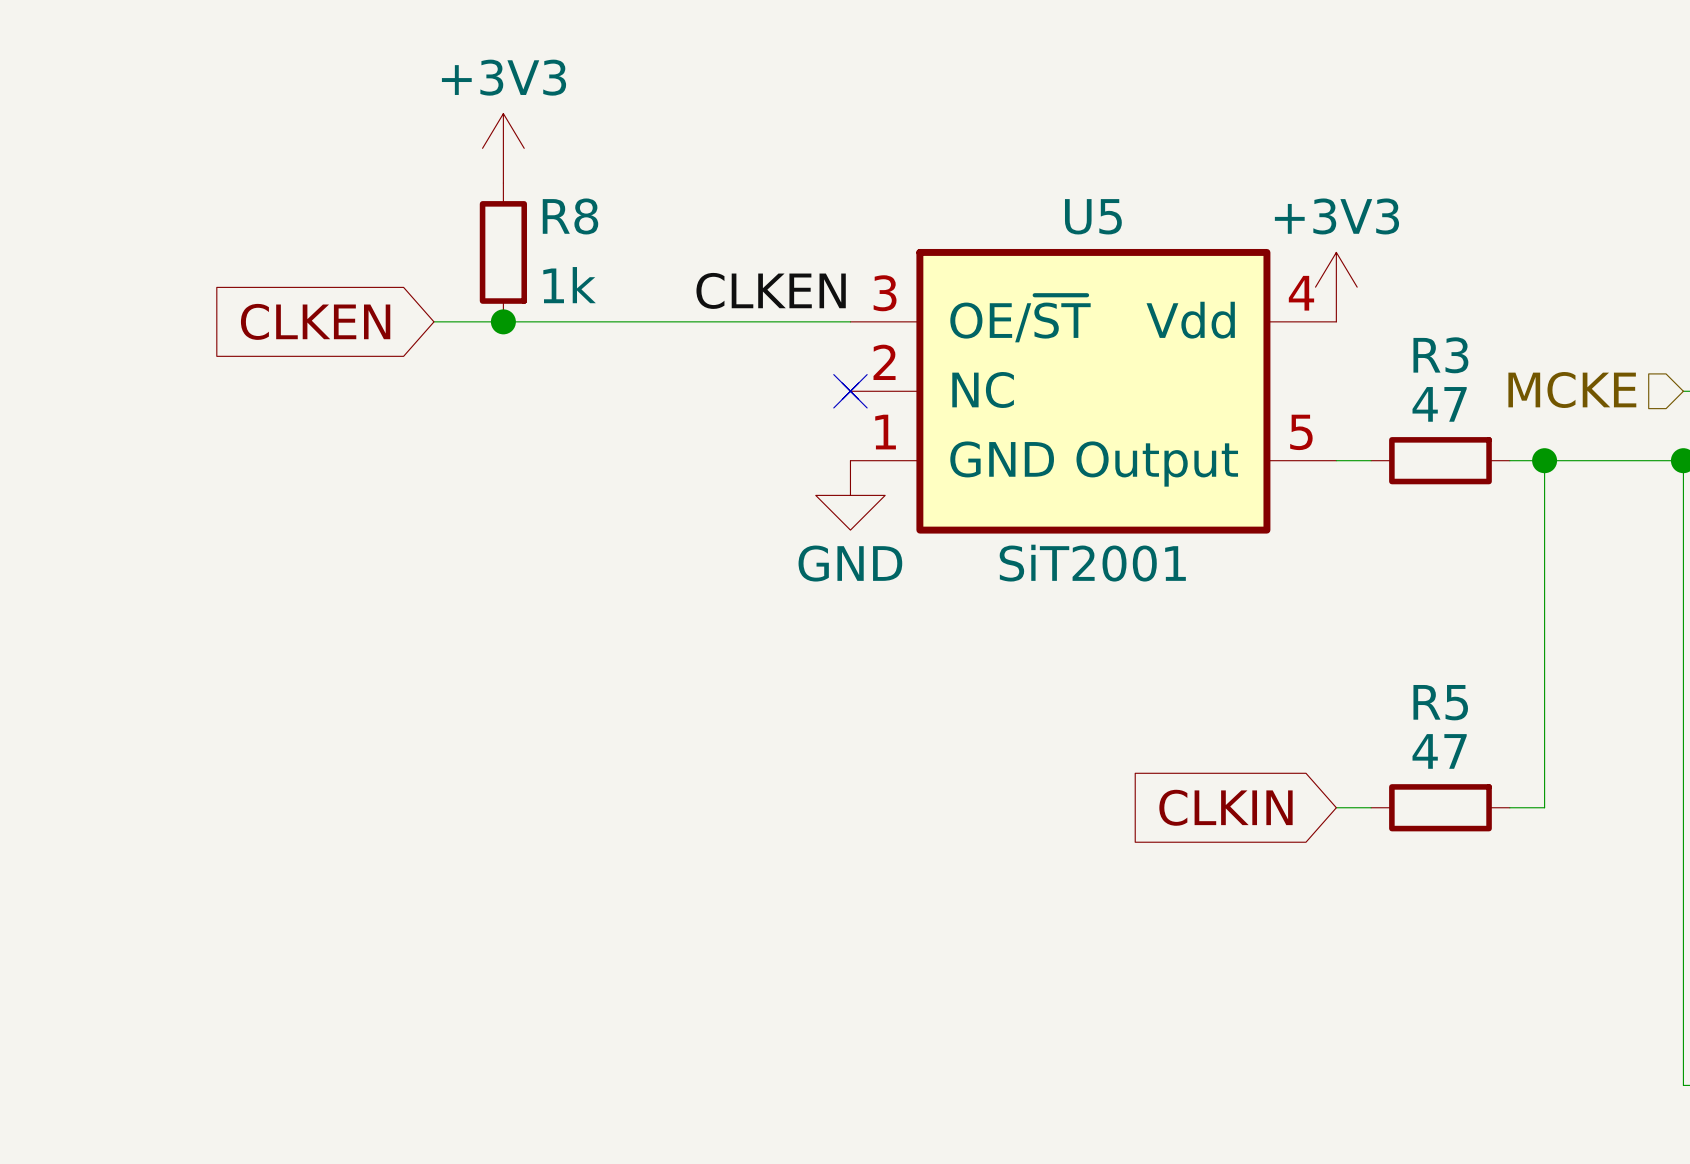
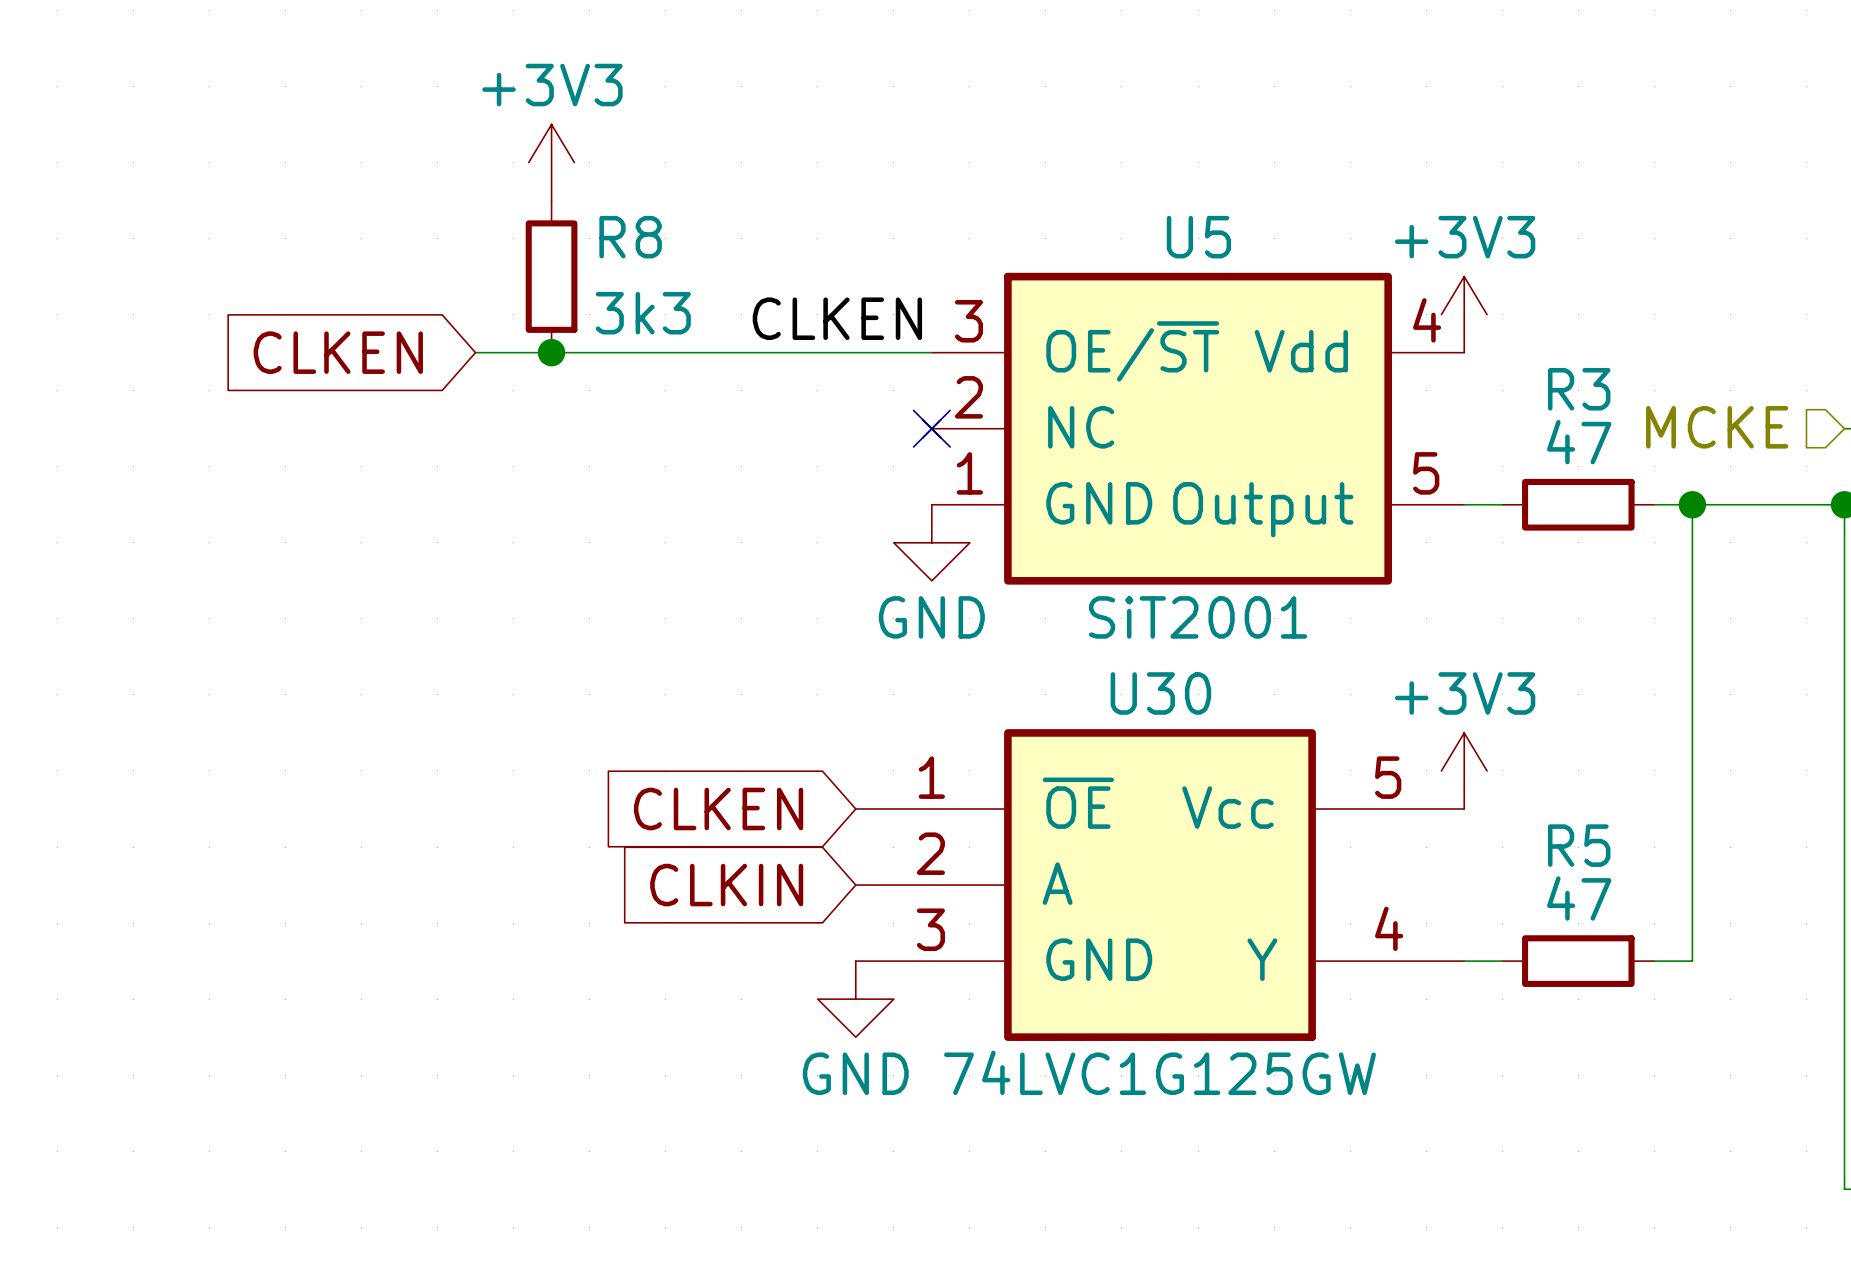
R8 value: 1k (569, 285) -> 3k3 (643, 313)
power symbol: none -> +3V3 (1464, 770)
global label: none -> CLKEN (718, 808)
U30: none -> 74LVC1G125GW (1160, 885)
global label position: CLKIN (1225, 807) -> CLKIN (726, 885)
wire: (1336, 807) (1371, 807) -> (1464, 961) (1502, 961)
R5 position: (1440, 807) -> (1578, 961)
wire: (1509, 807) (1544, 807) -> (1654, 961) (1692, 961) (1692, 885)
power symbol: none -> GND (855, 999)

